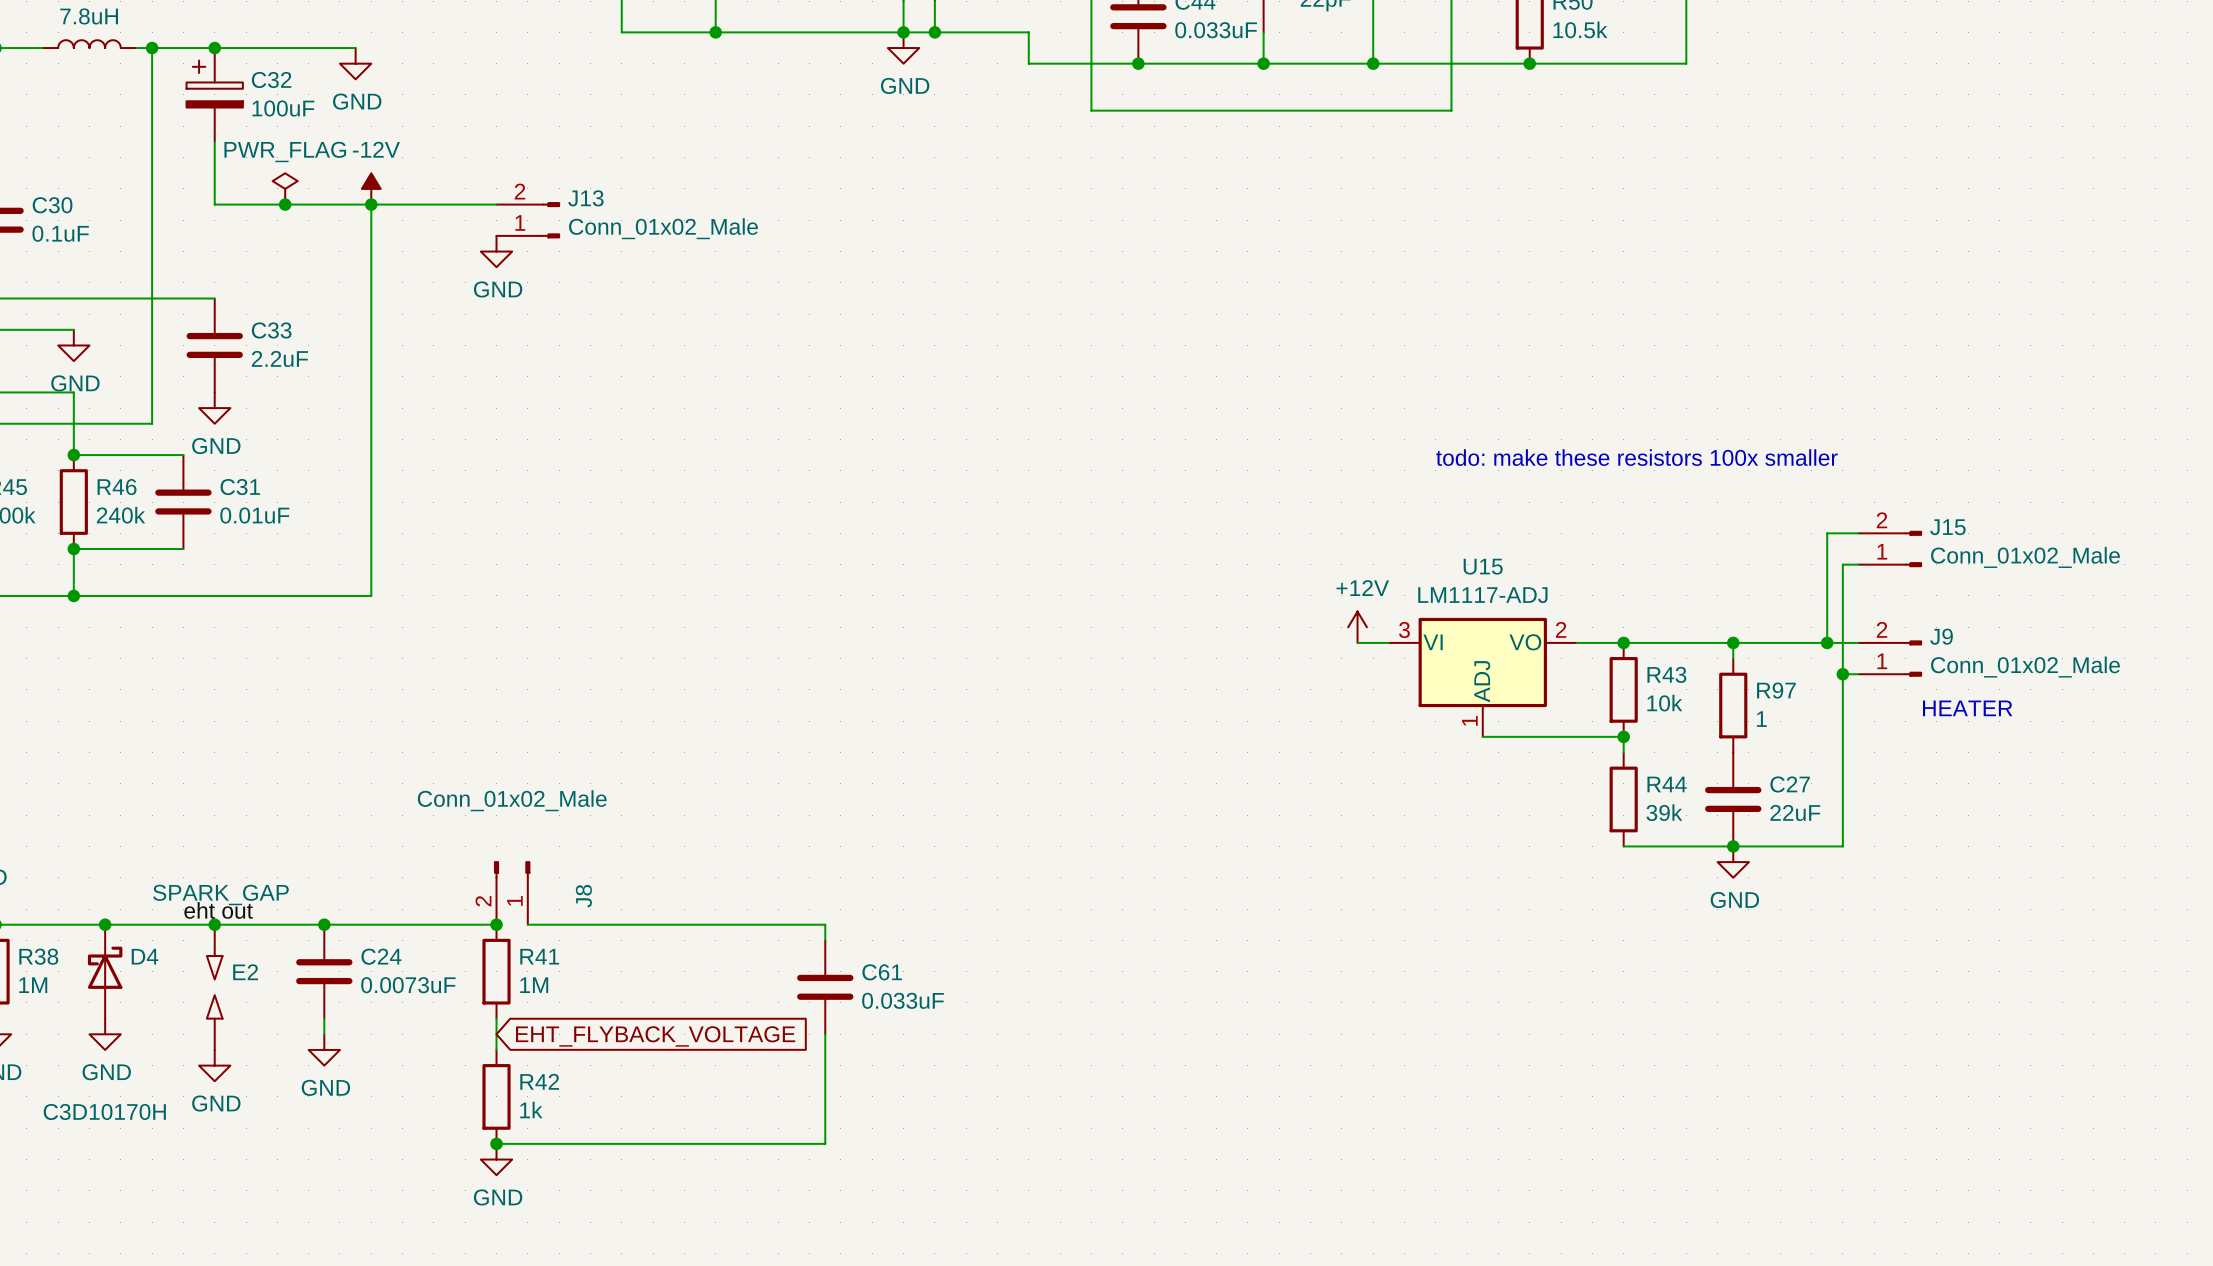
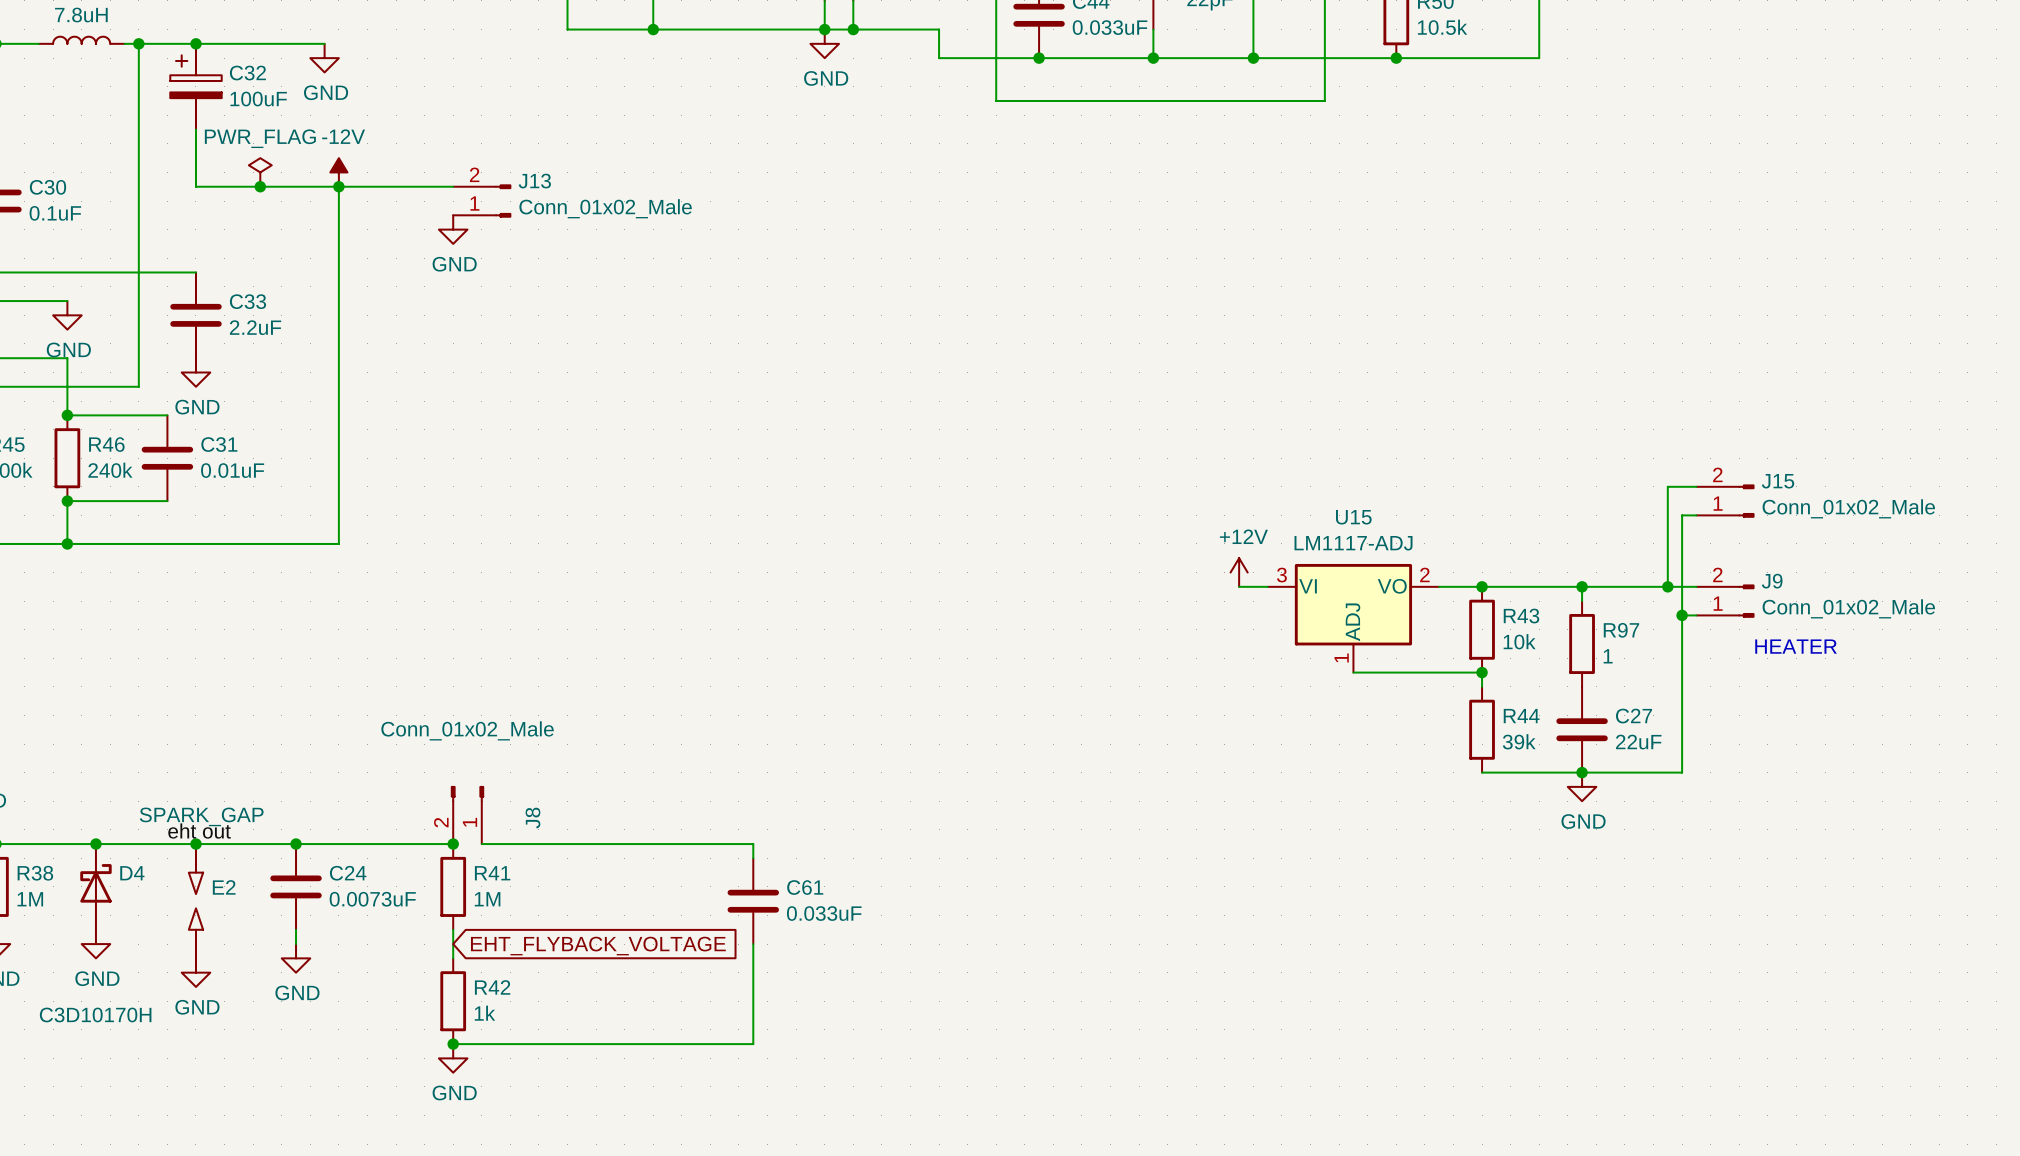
text: todo: make these resistors 100x smaller (1636, 457) -> none

